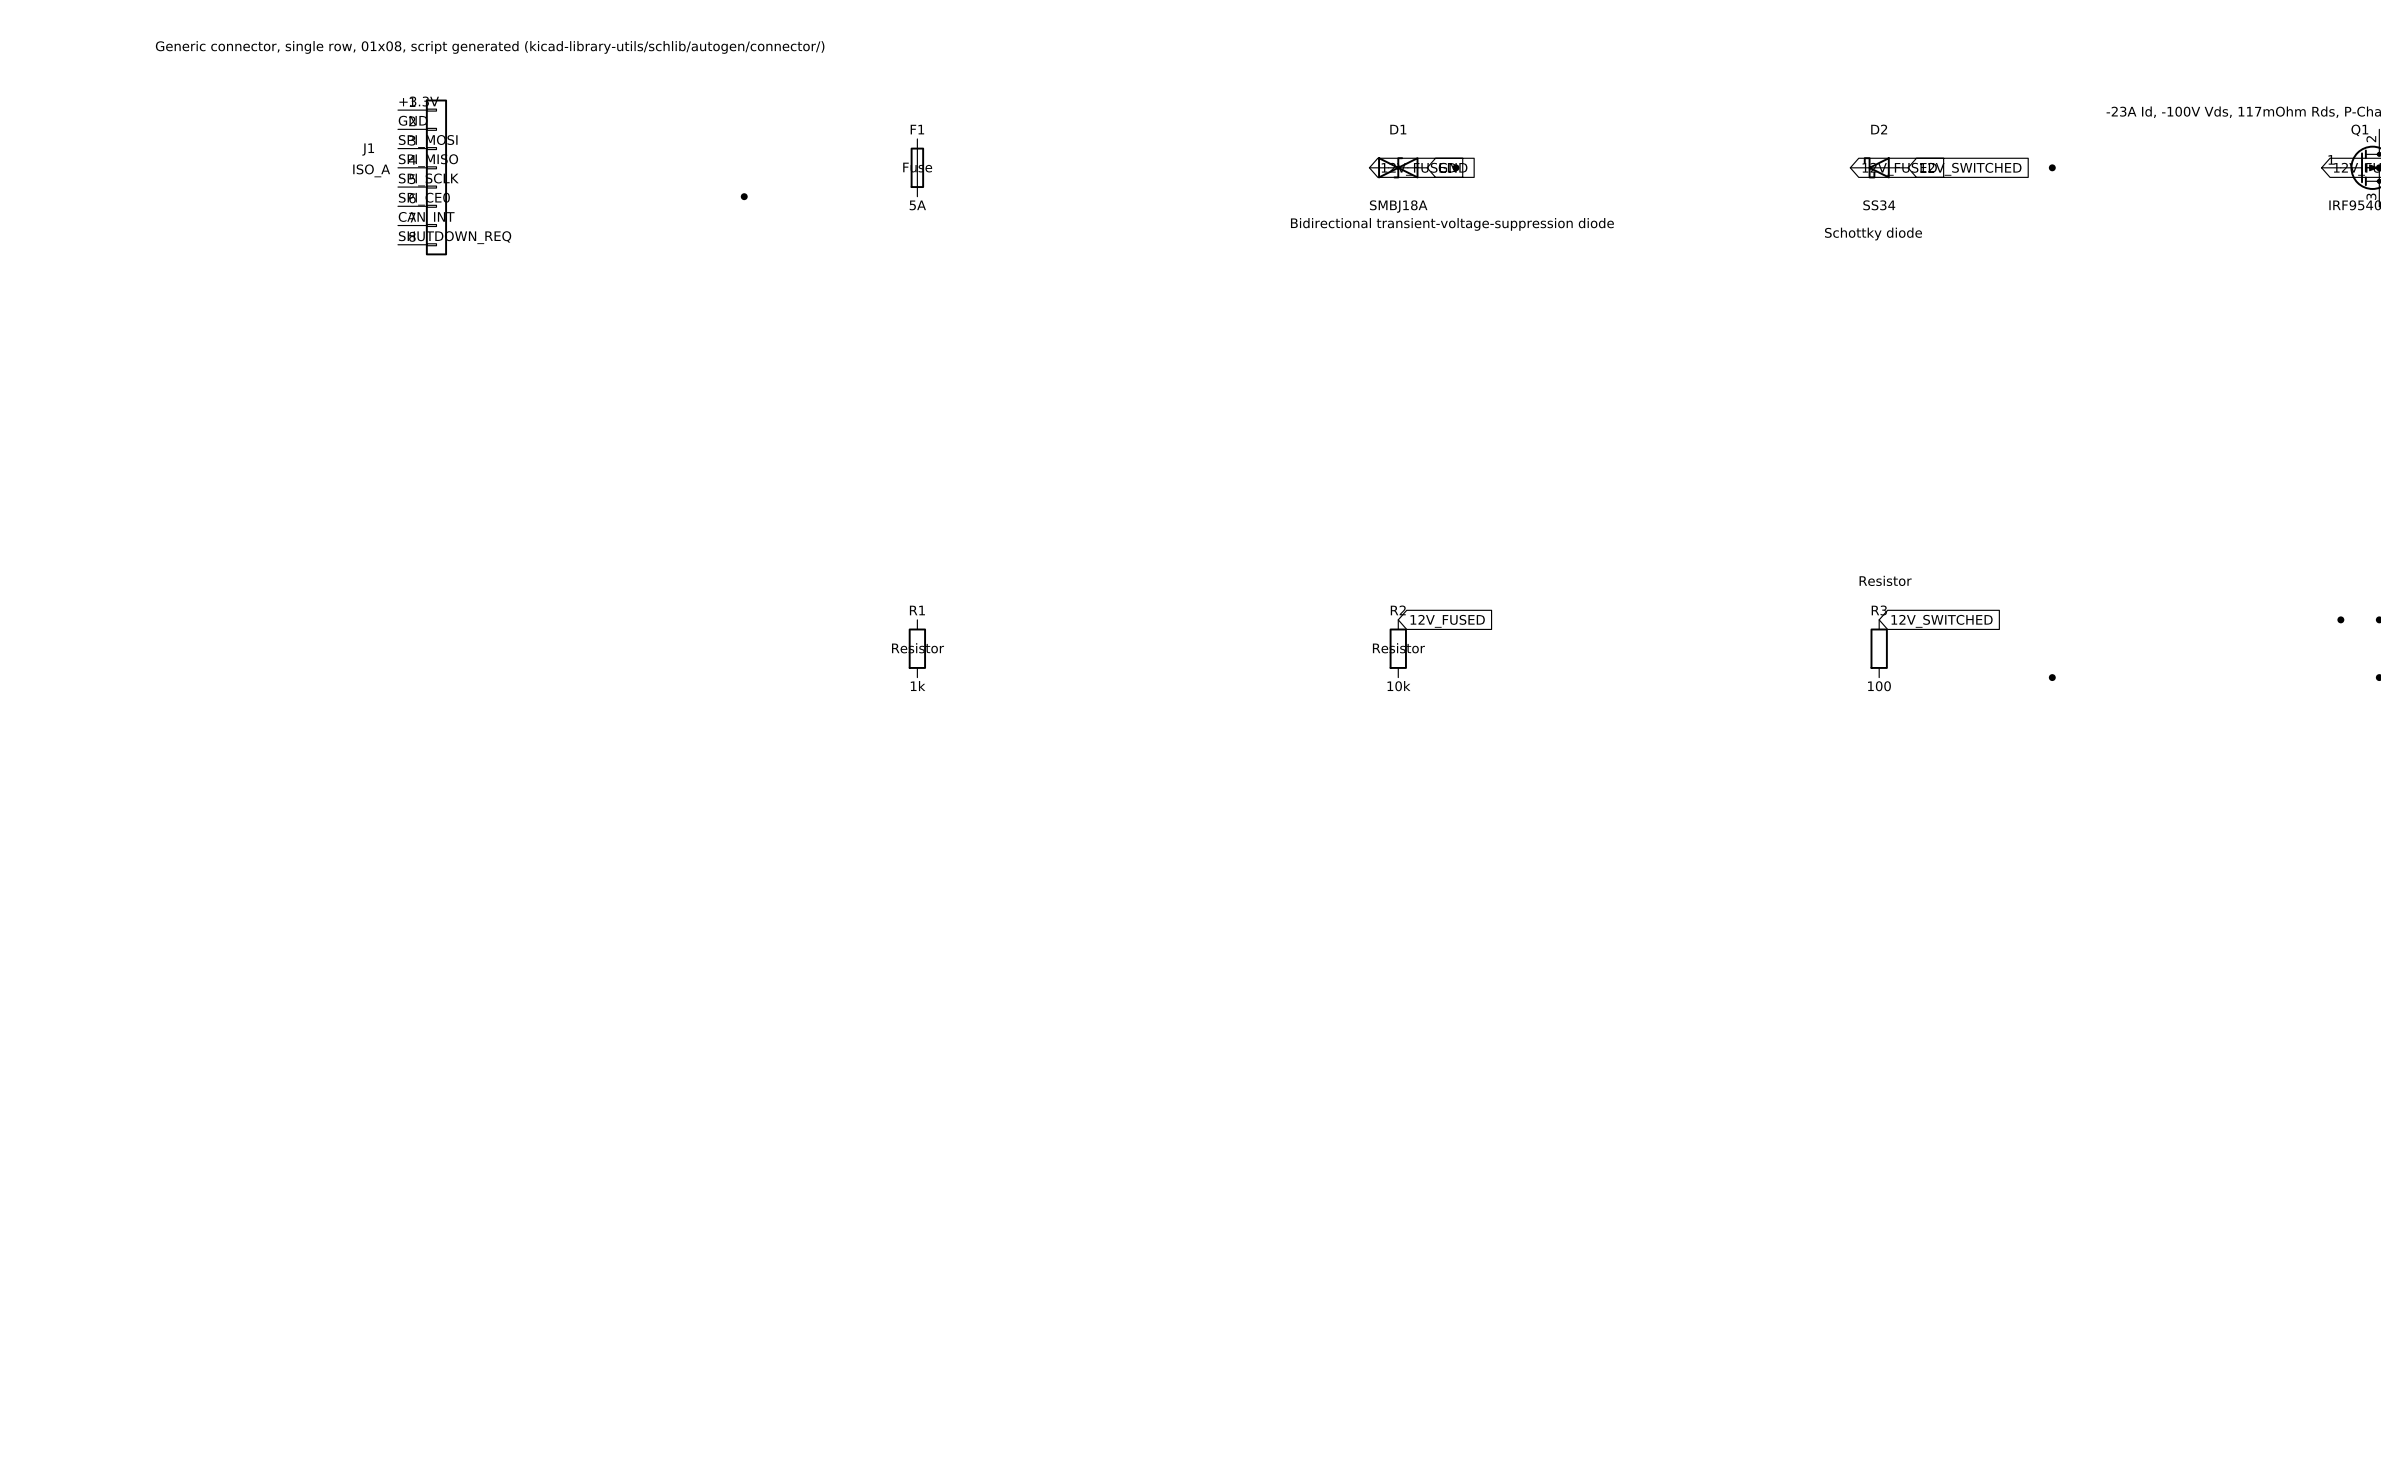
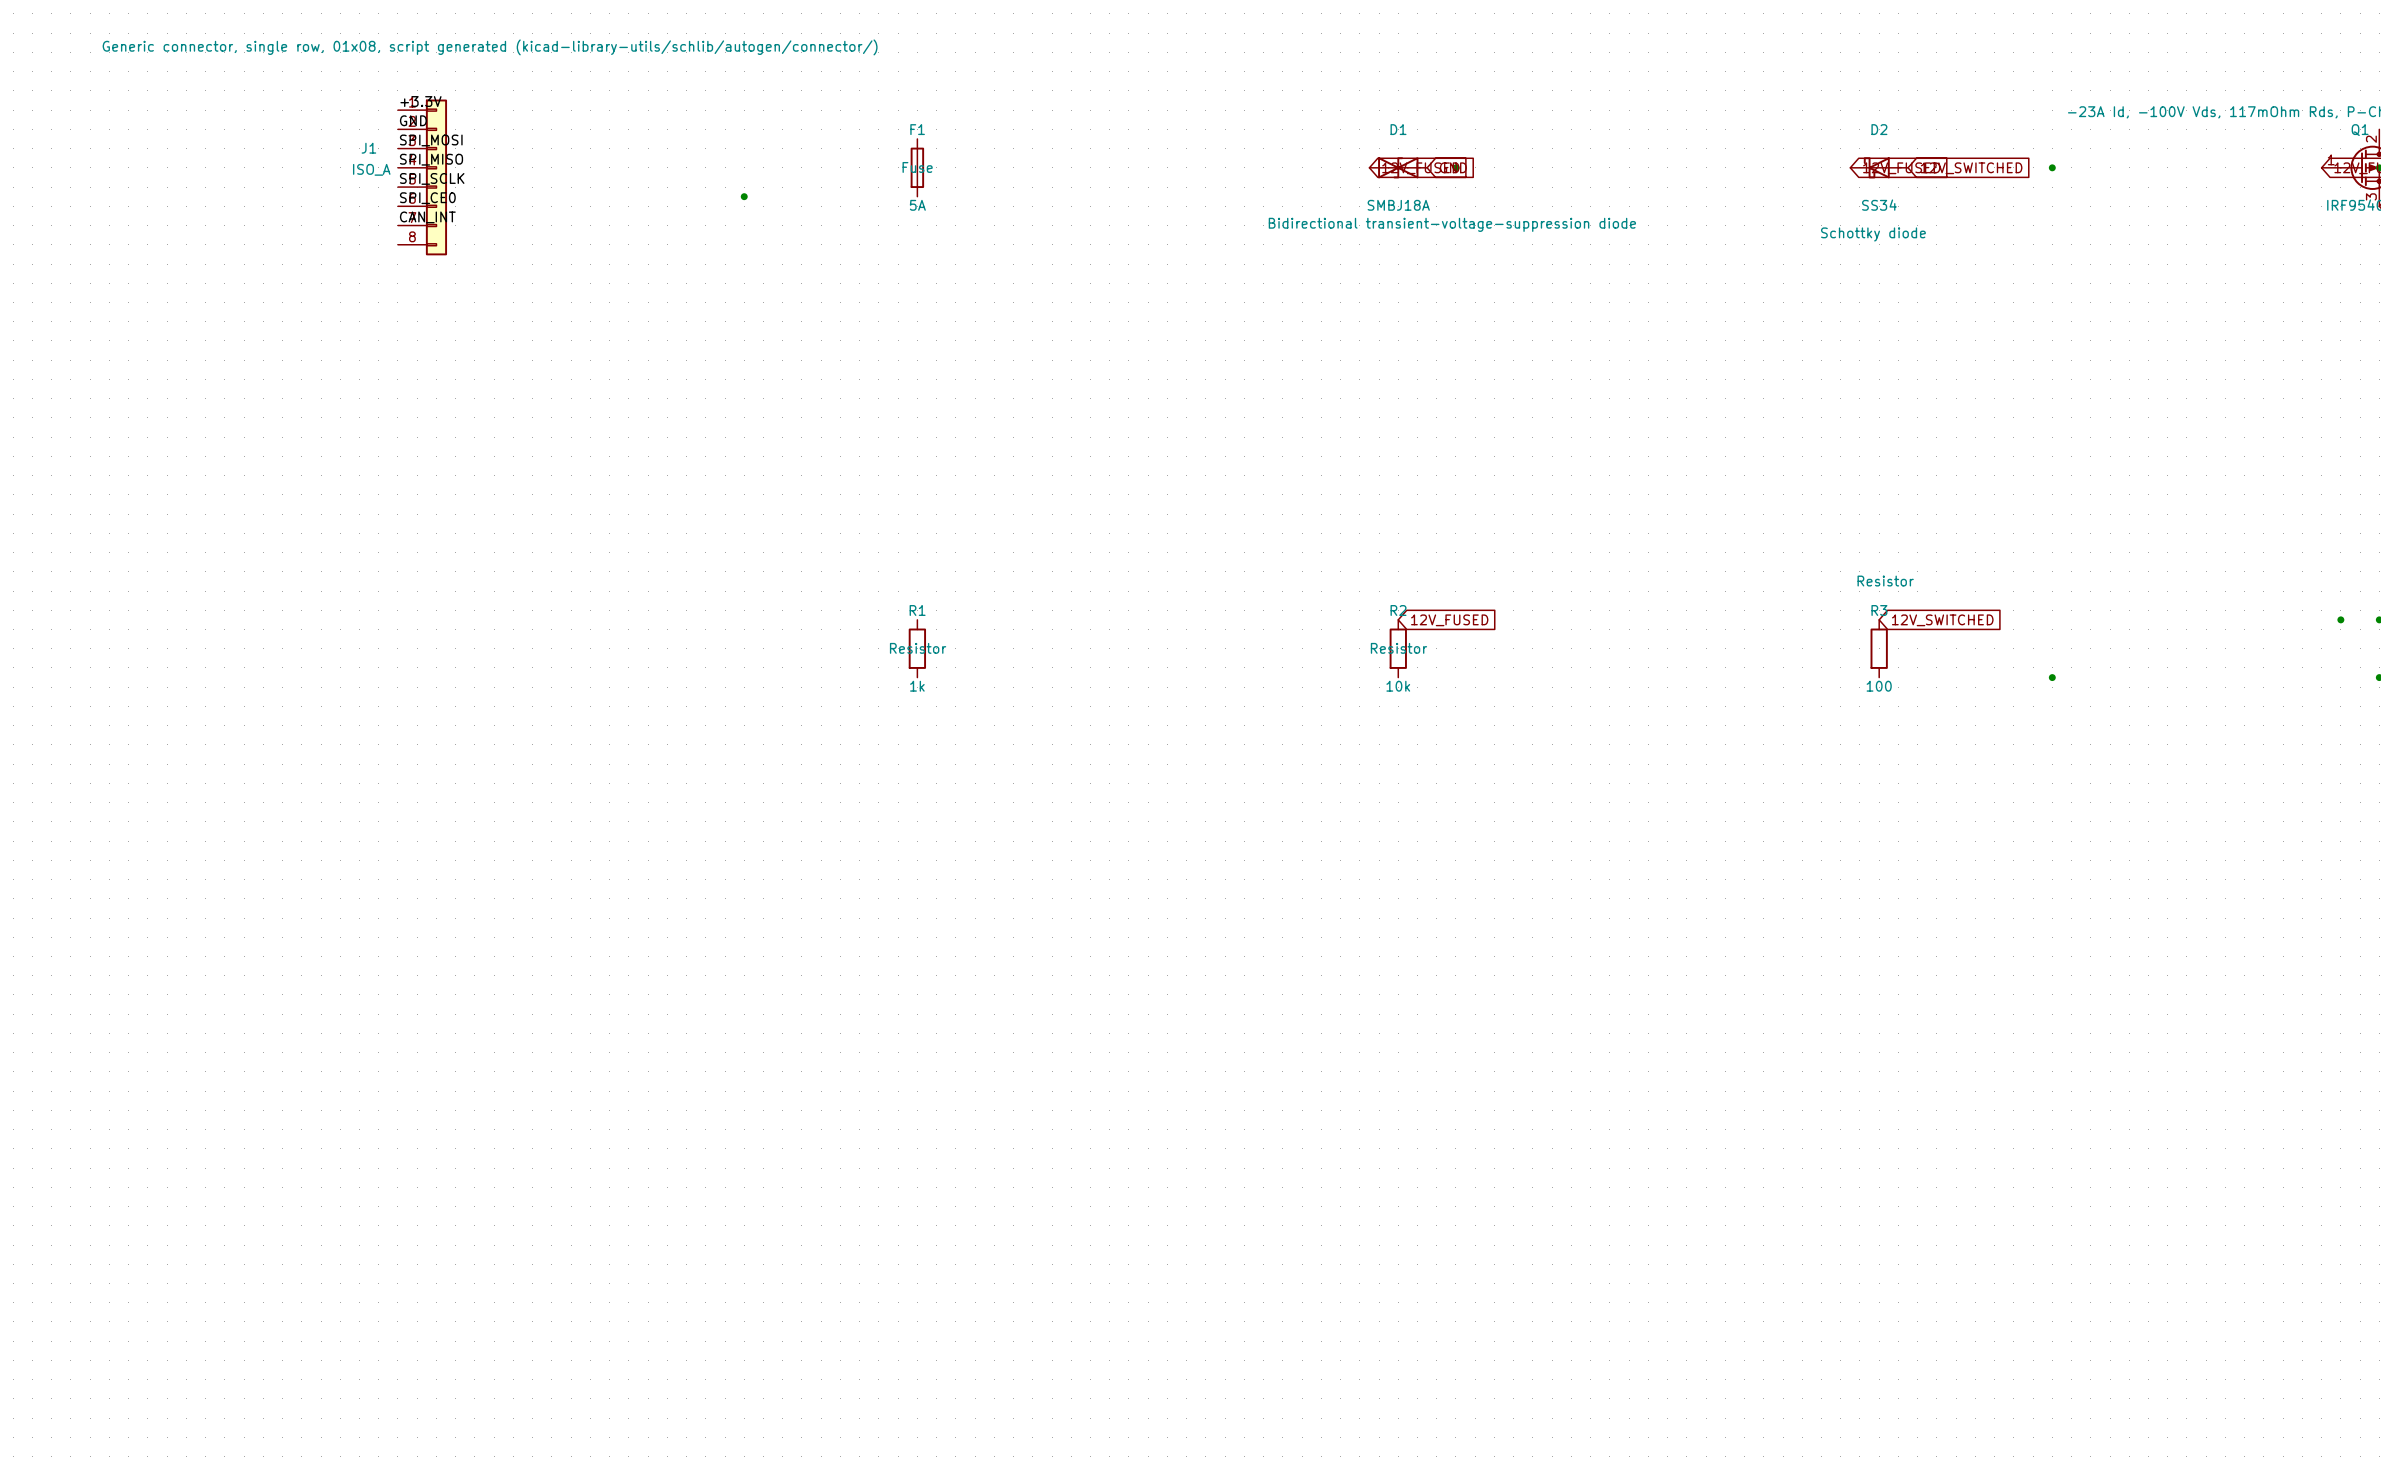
label: SHUTDOWN_REQ (455, 237) -> none

